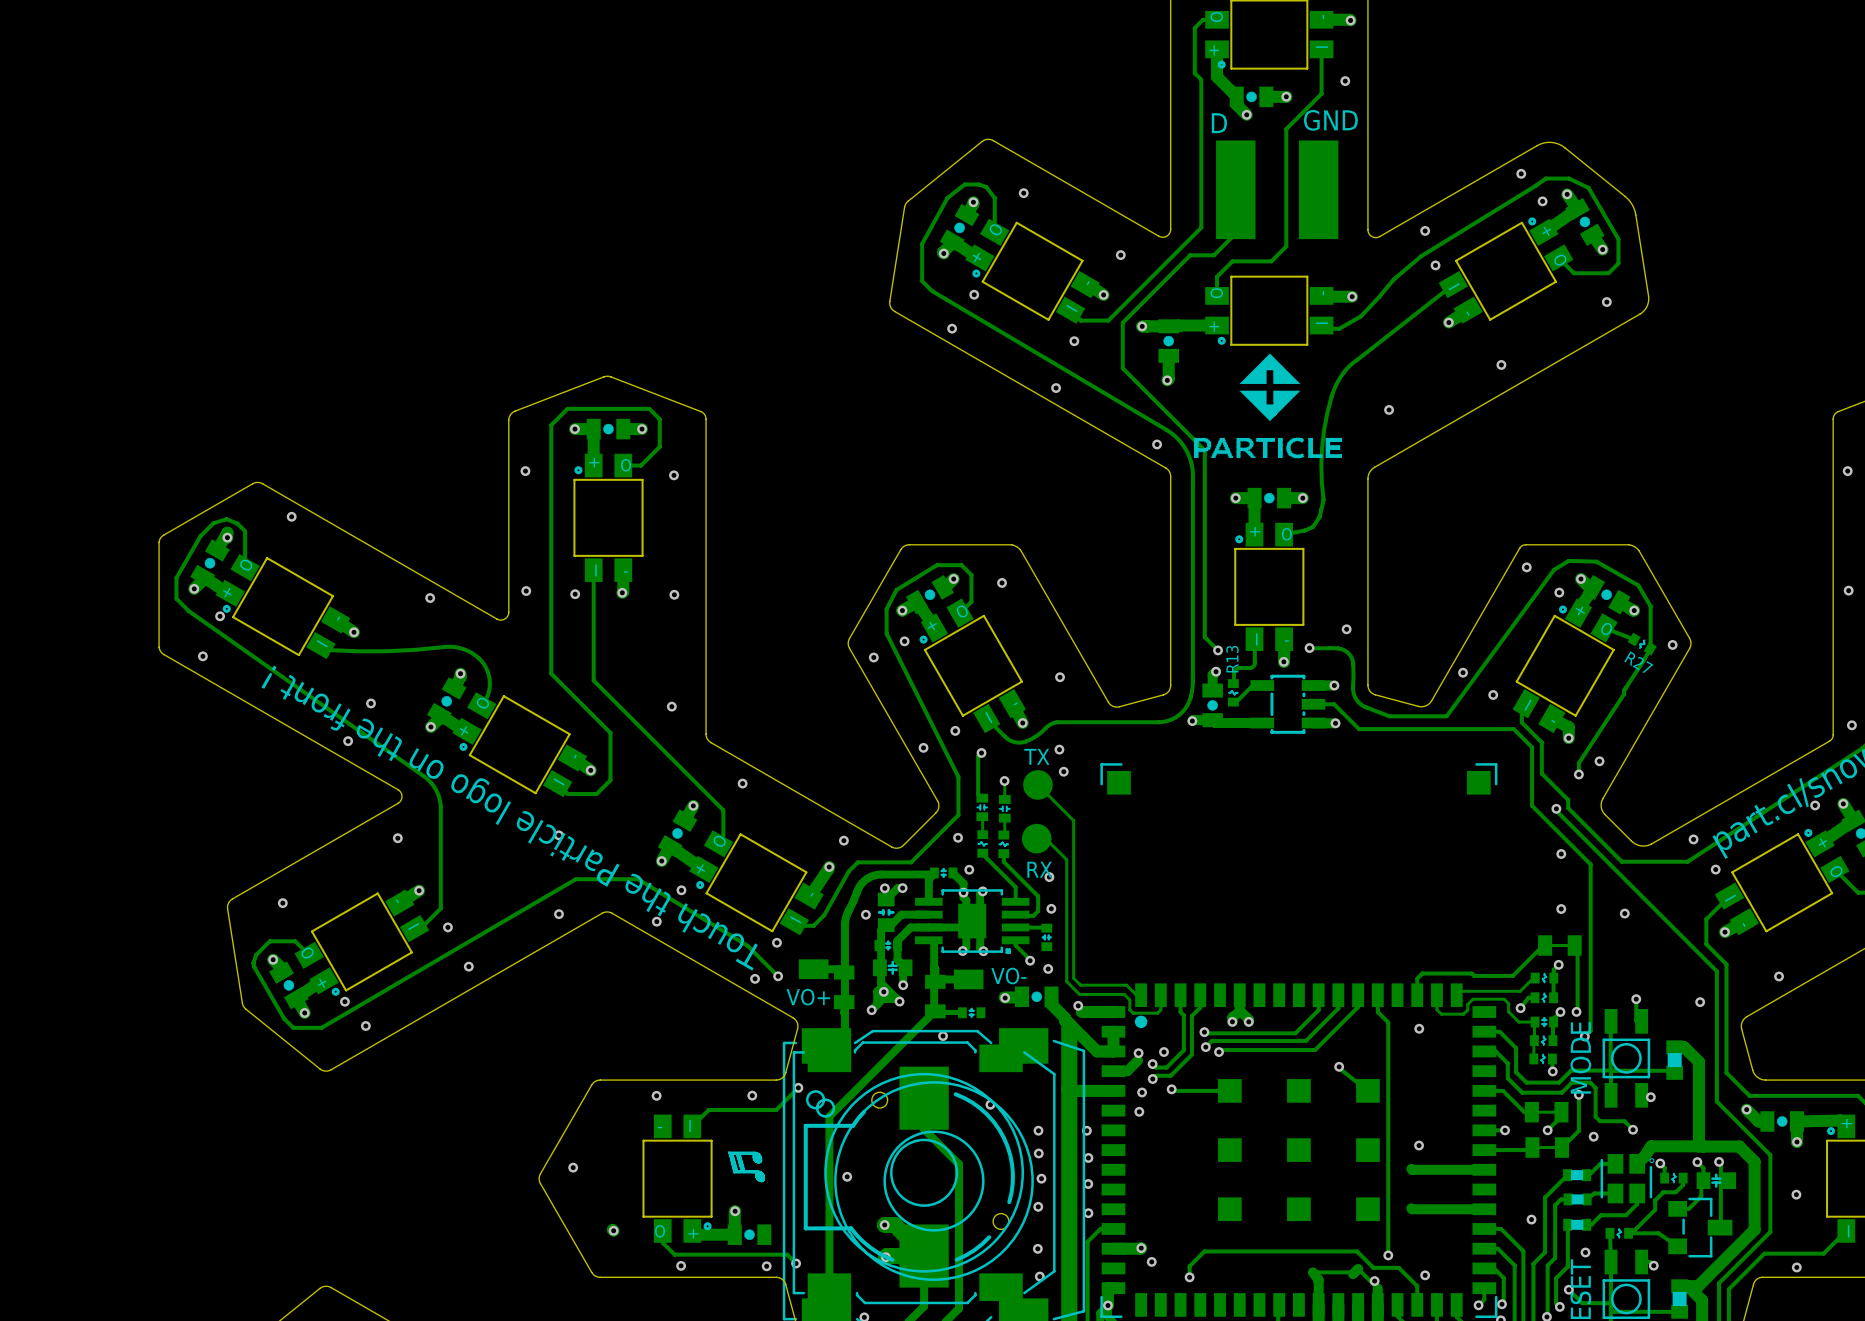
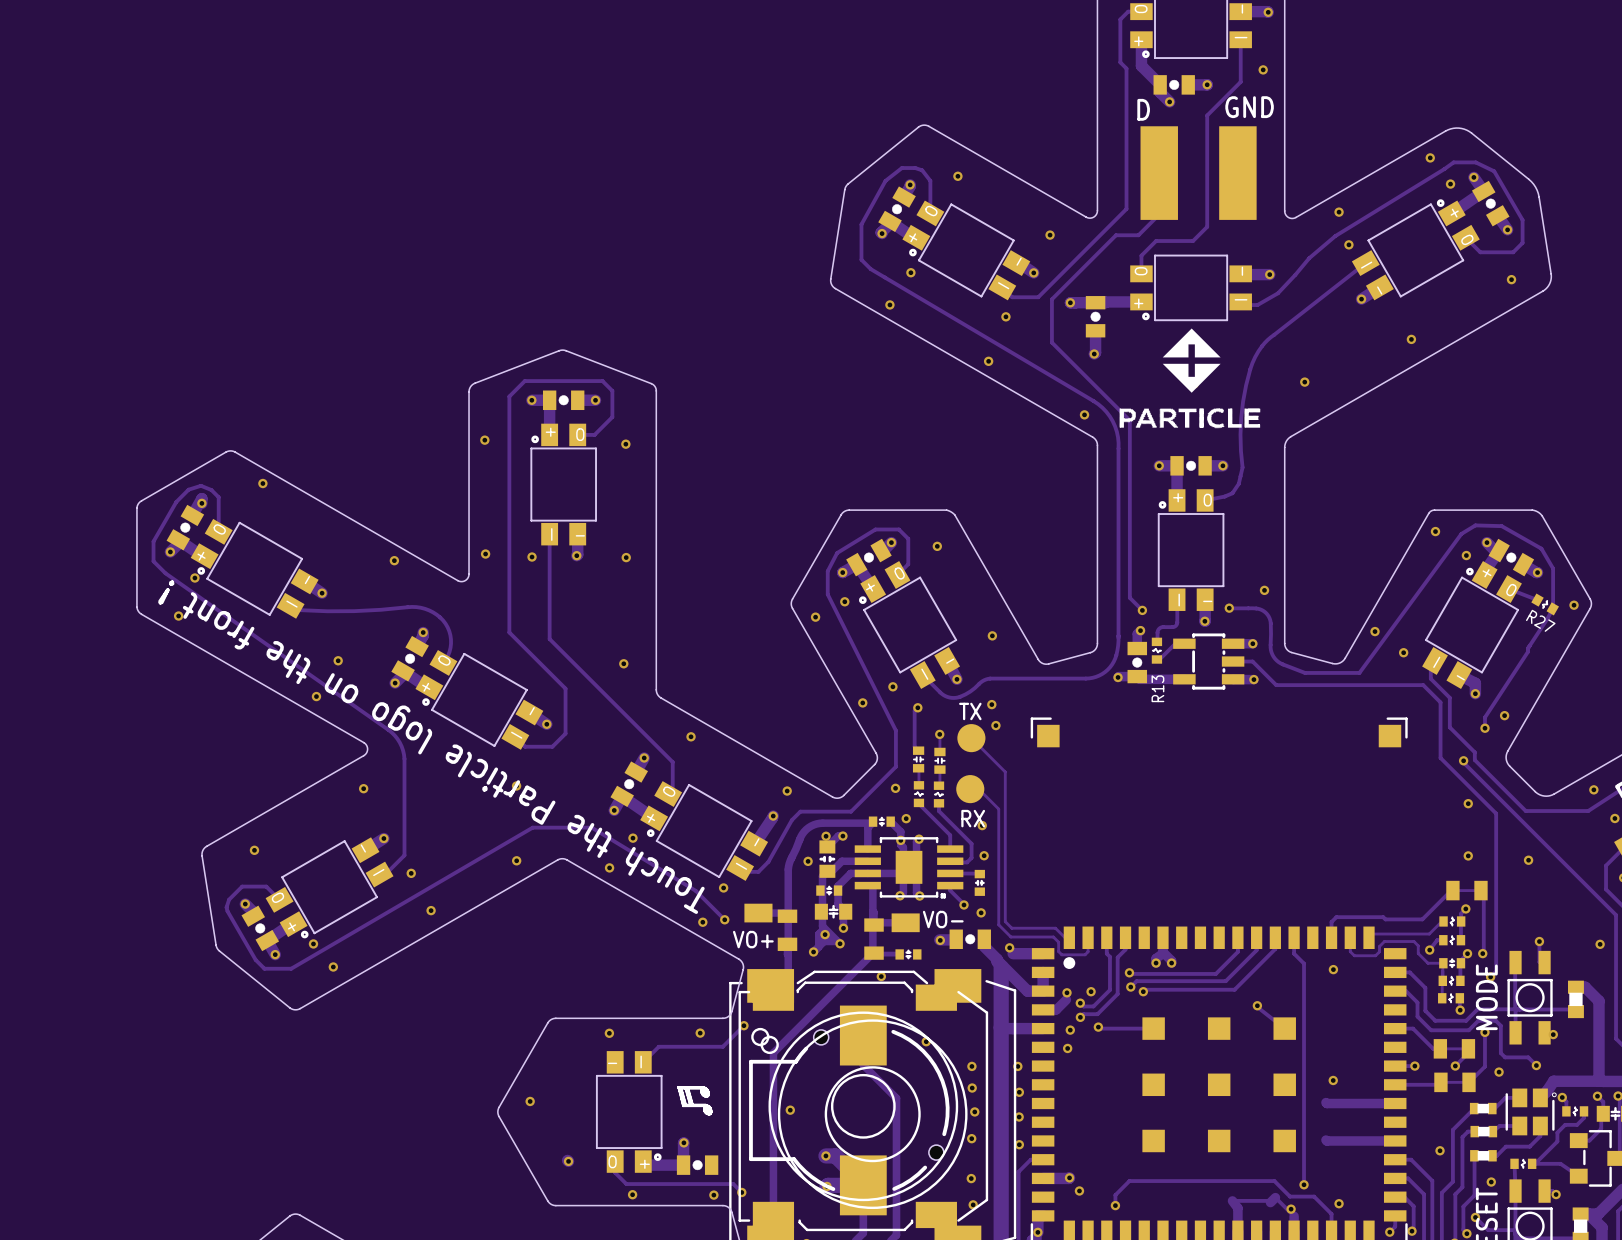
R13 name position: R13 (1232, 659) -> R13 (1157, 688)

